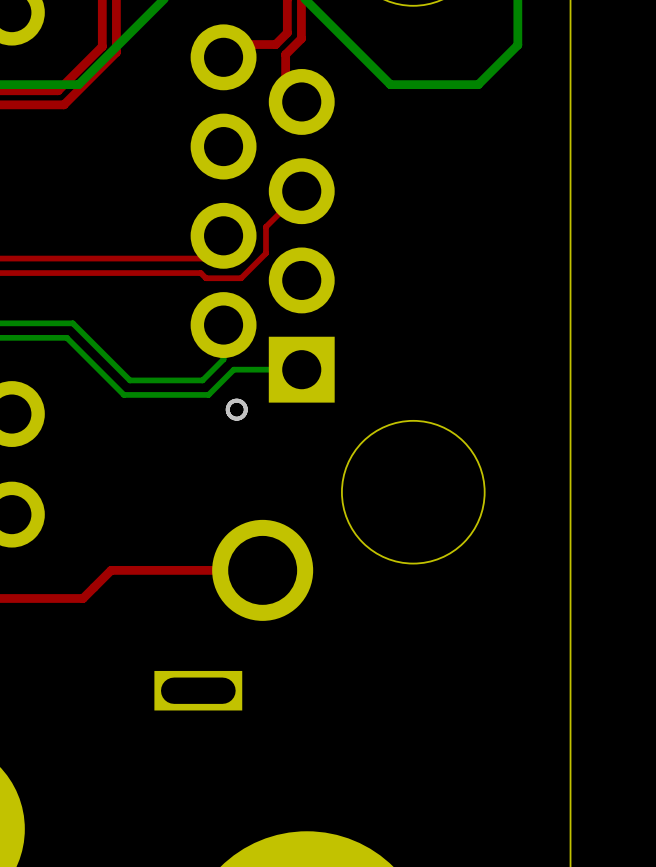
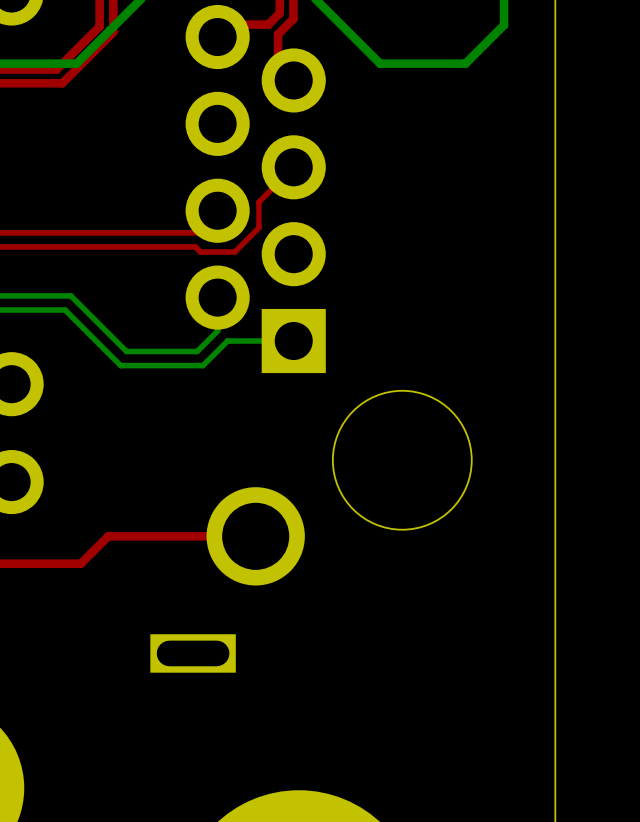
via: (236, 409) -> none

